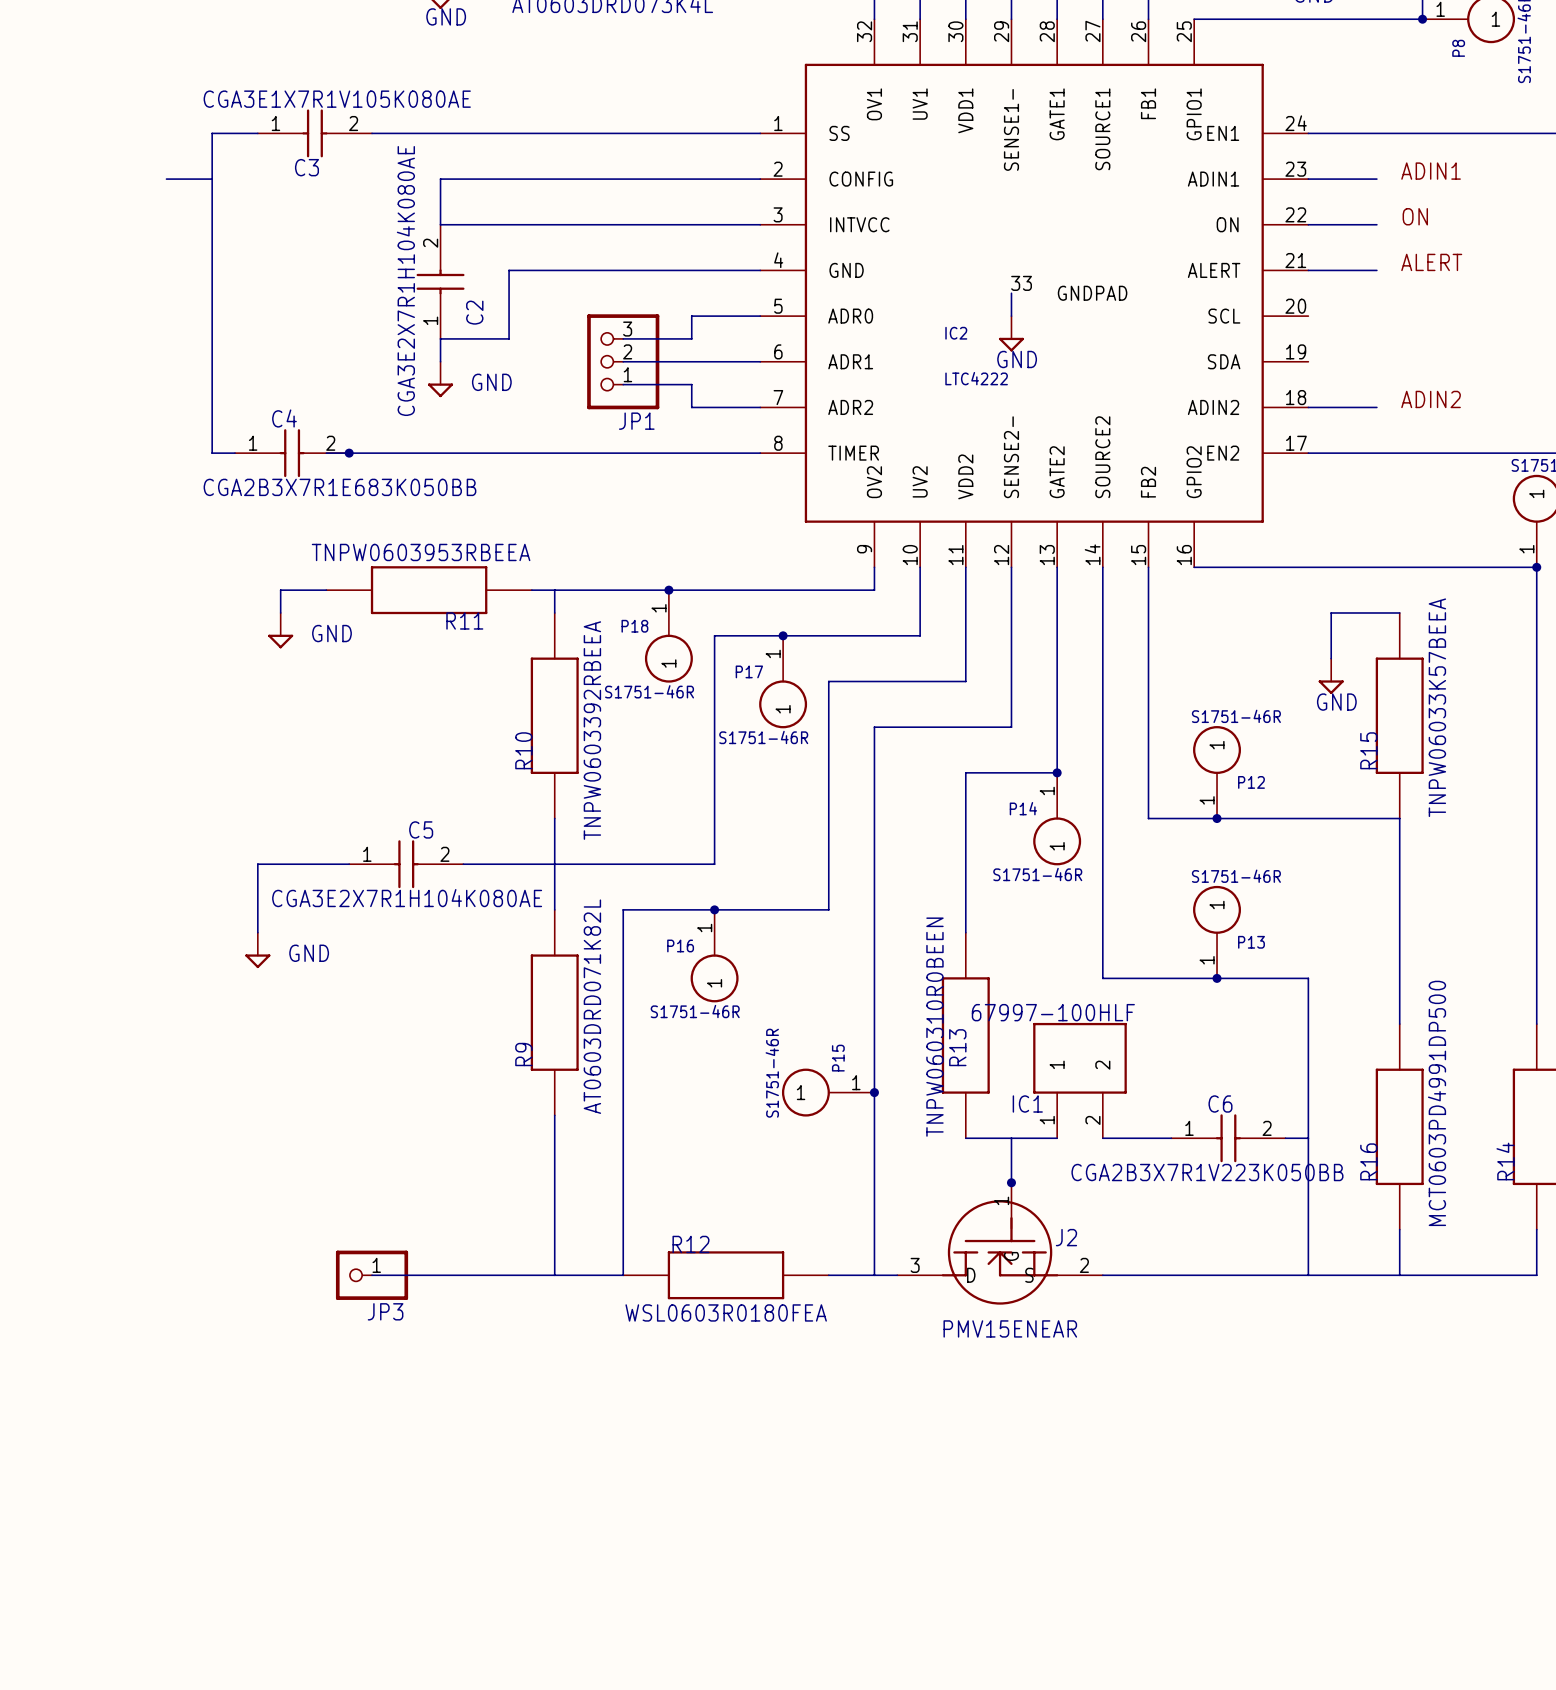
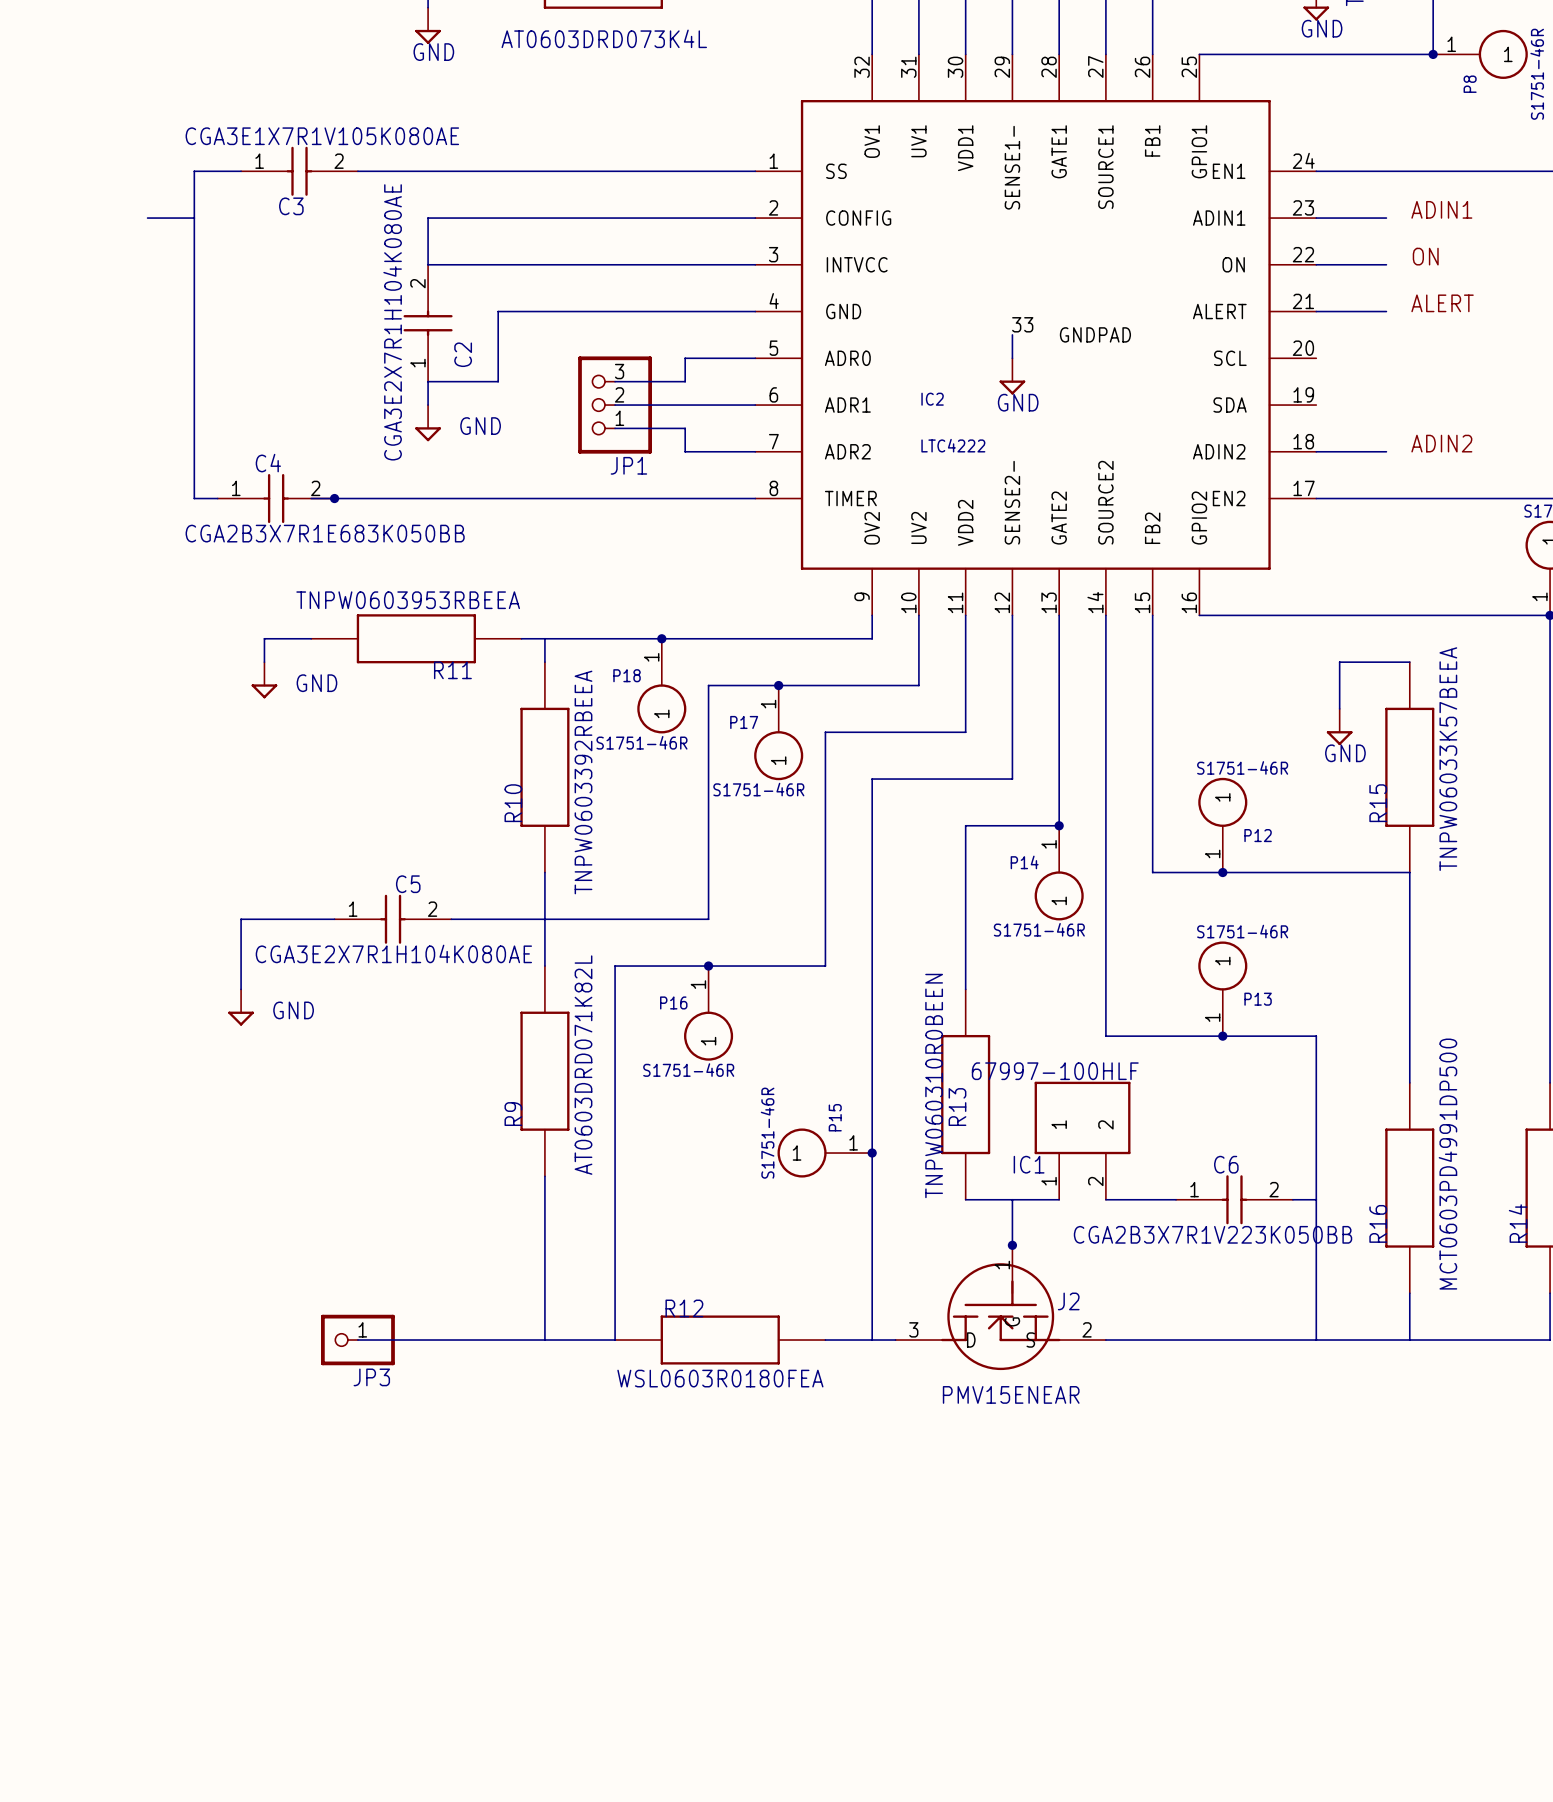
IC2 name position: IC2 (956, 333) -> IC2 (932, 399)
IC2 value position: LTC4222 (976, 378) -> LTC4222 (953, 445)
J2 symbol: [897, 1182, 1103, 1305] -> [895, 1246, 1106, 1371]

